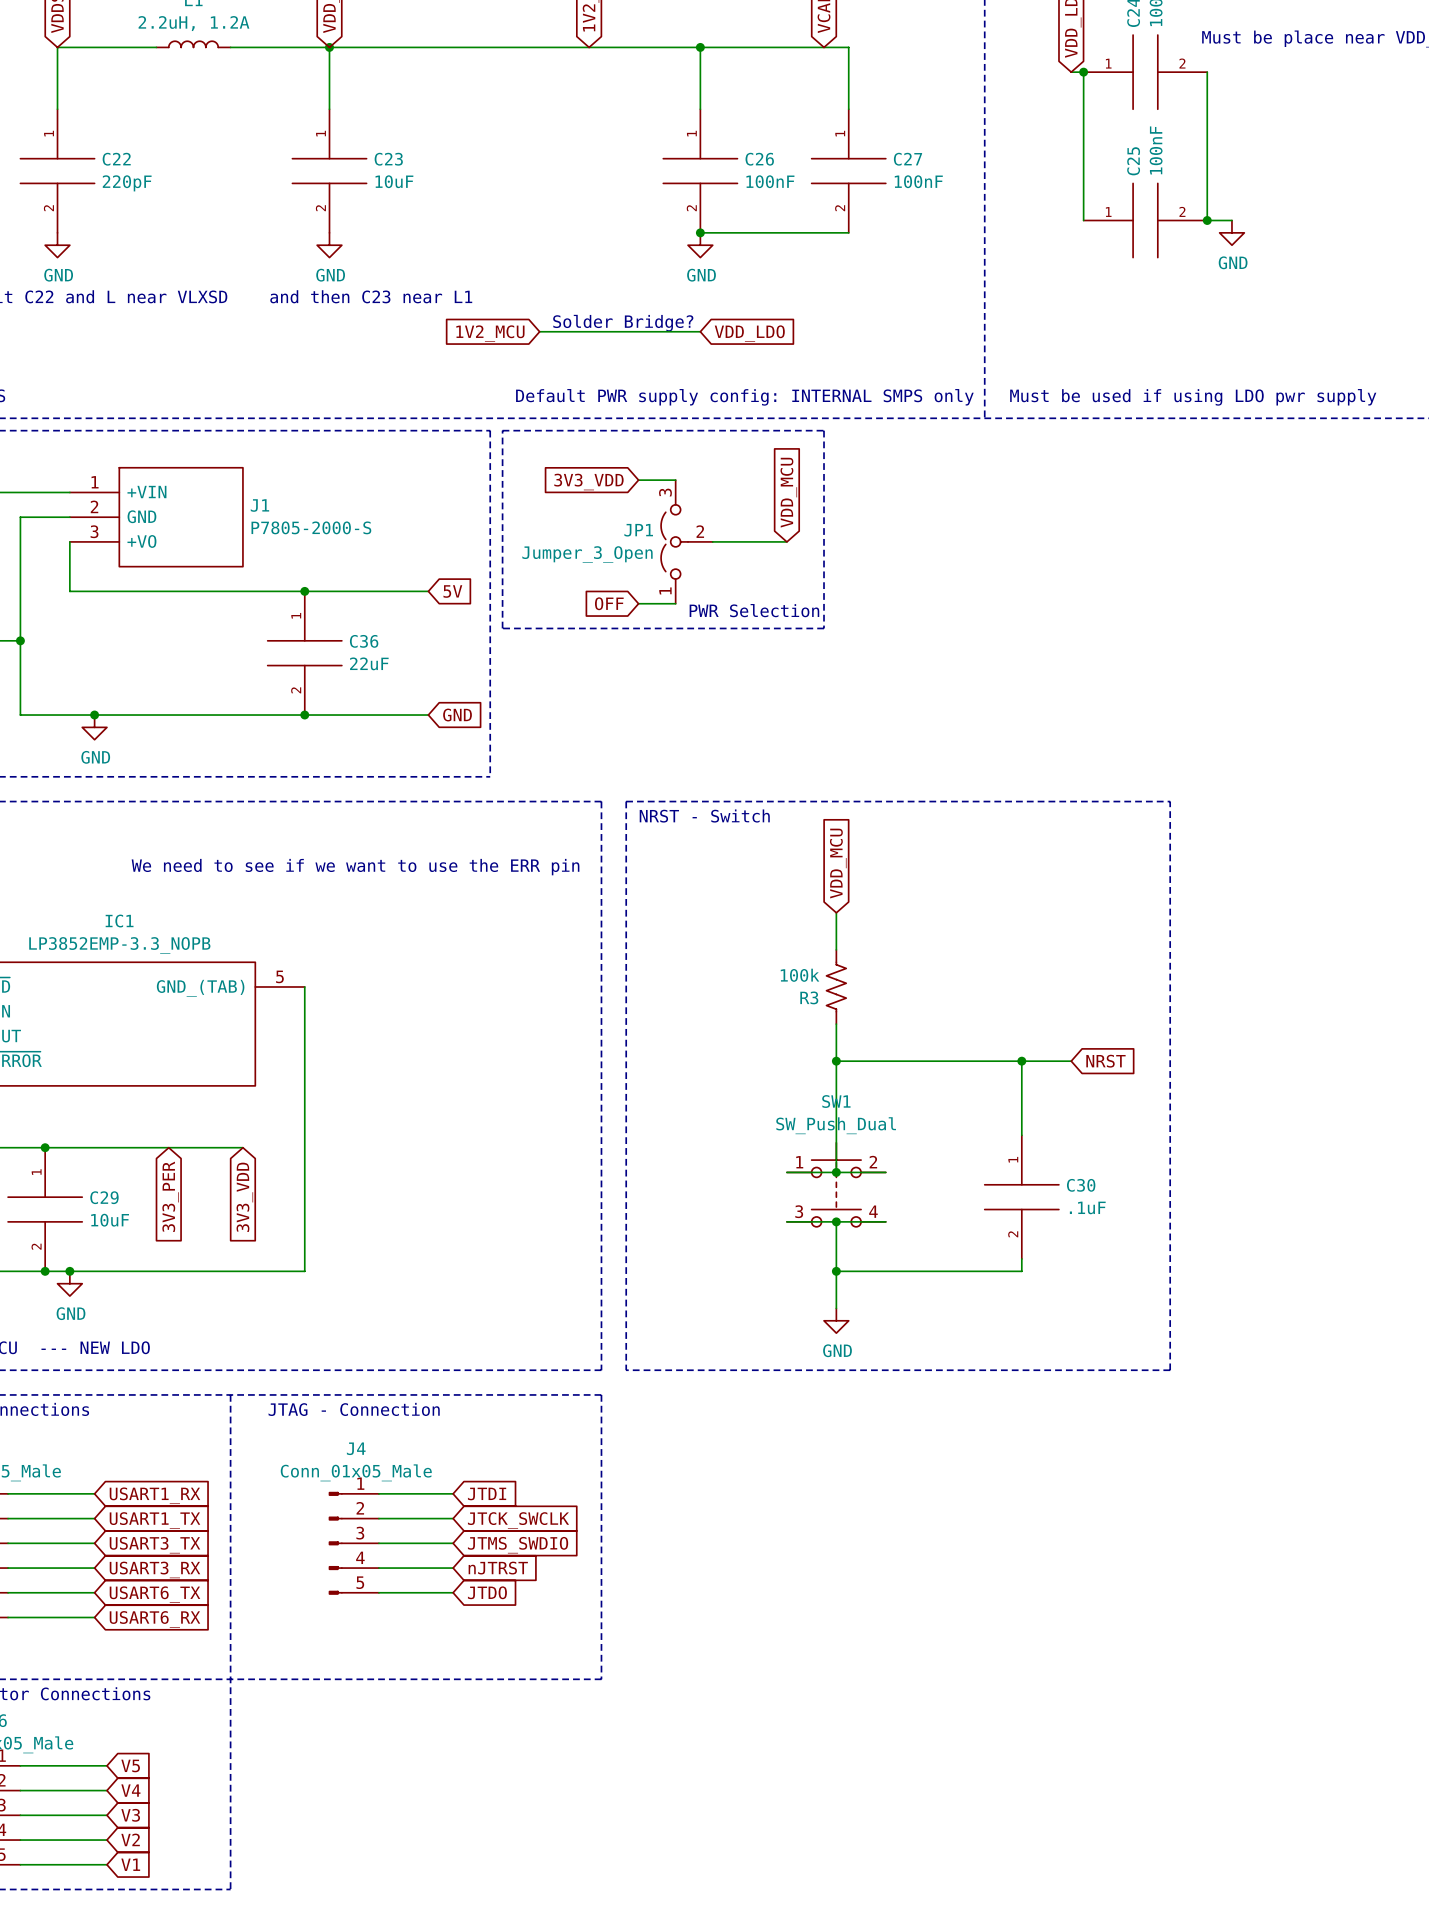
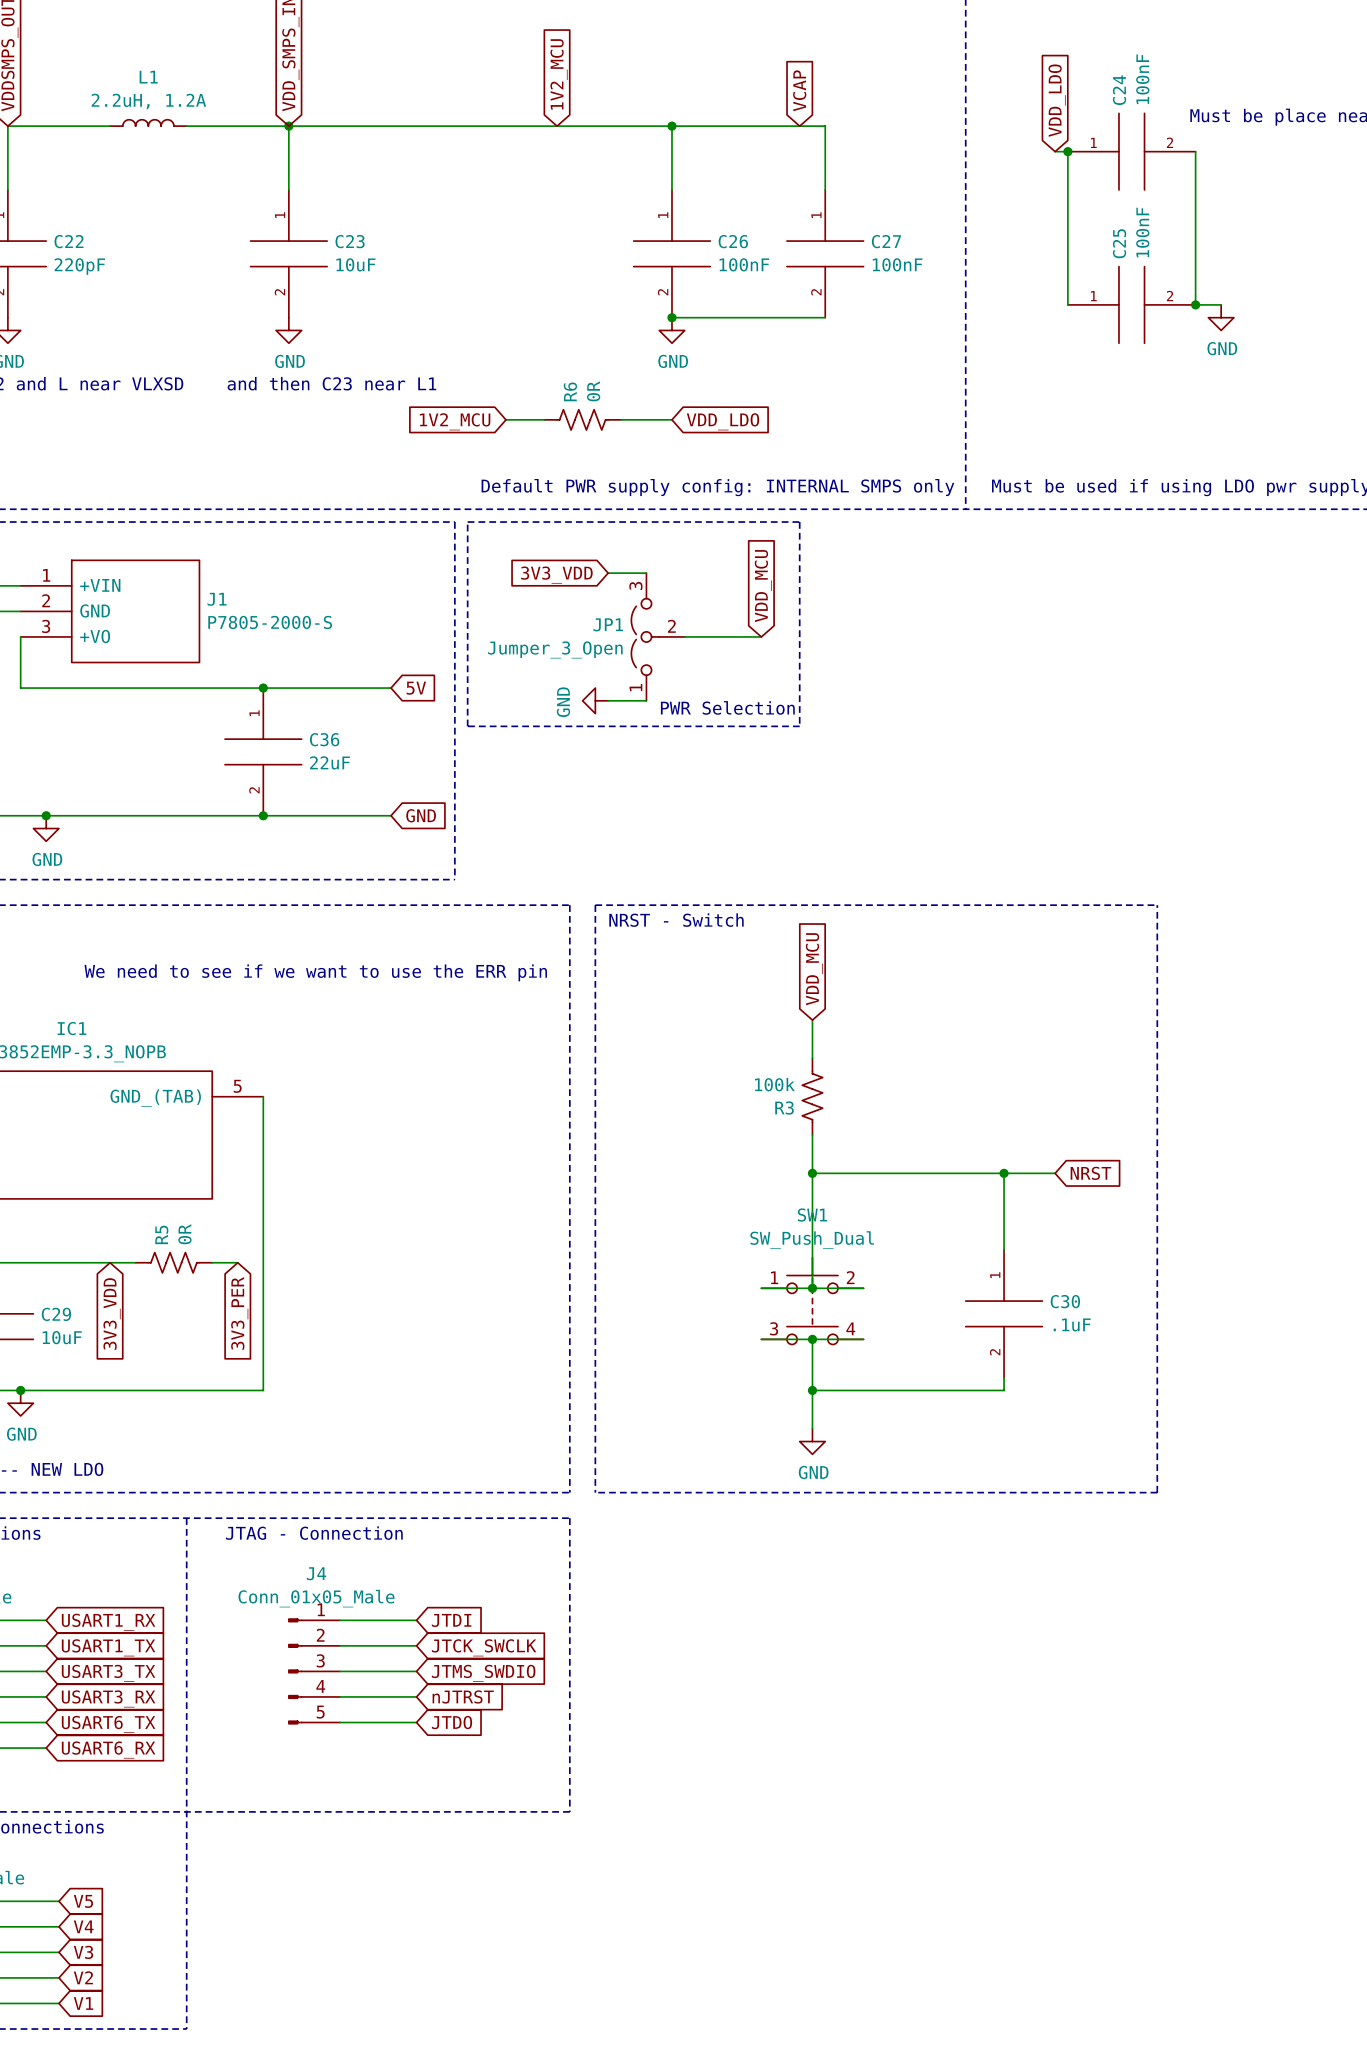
text: Solder Bridge? (623, 323) -> none
R6: none -> 0R (582, 419)
global label: OFF (609, 603) -> none
power symbol: none -> GND (595, 700)
wire: (181, 1147) (242, 1147) -> none
R5: none -> 0R (173, 1262)
wire: none -> (212, 1262) (237, 1262)
global label position: 3V3_PER (170, 1196) -> 3V3_PER (239, 1313)
global label position: 3V3_VDD (244, 1197) -> 3V3_VDD (112, 1313)

